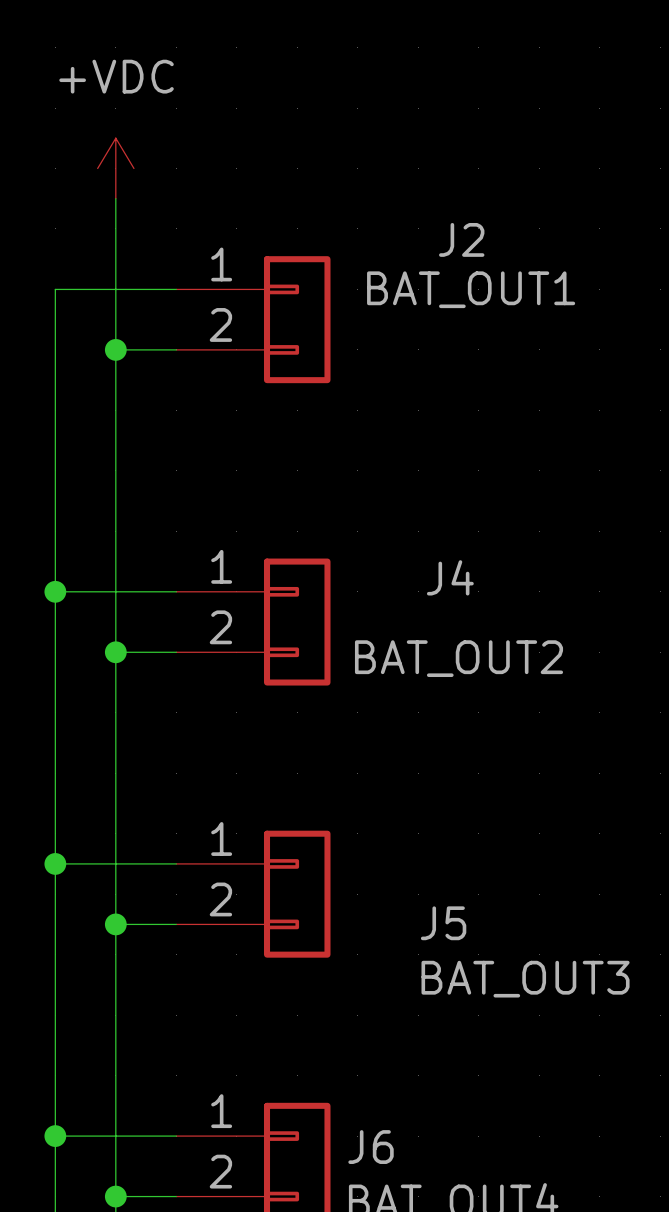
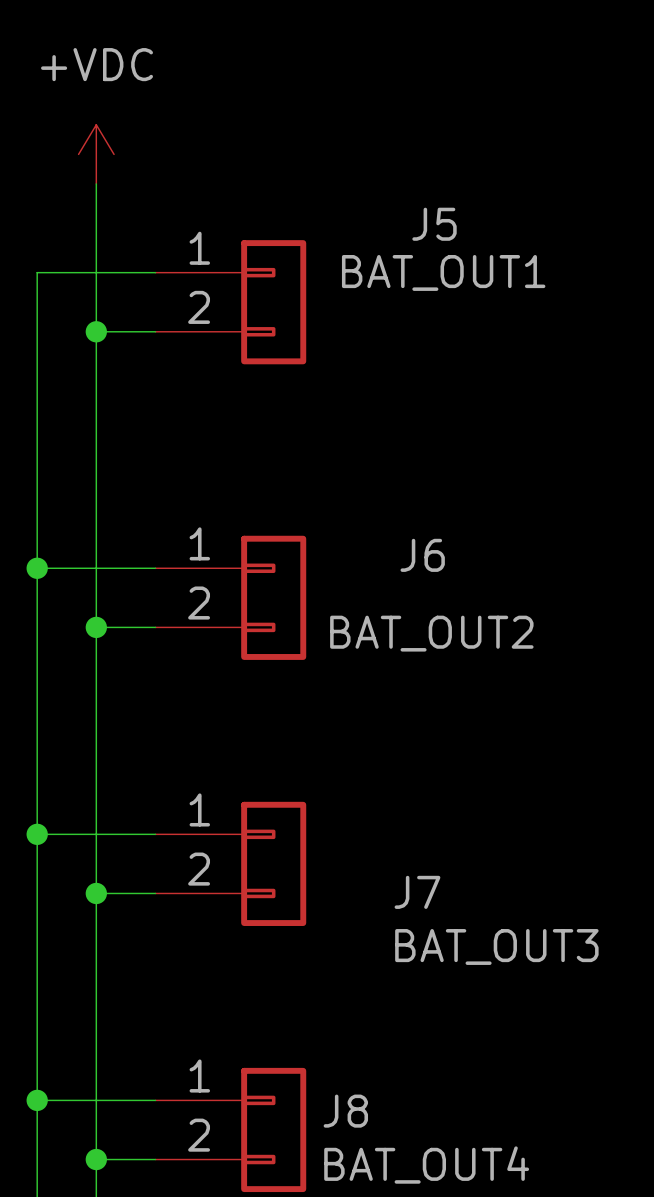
J2 name: J2 (461, 239) -> J5 (434, 224)
J4 name: J4 (450, 577) -> J6 (422, 555)
J5 name: J5 (443, 923) -> J7 (417, 892)
J6 name: J6 (371, 1147) -> J8 (345, 1111)

